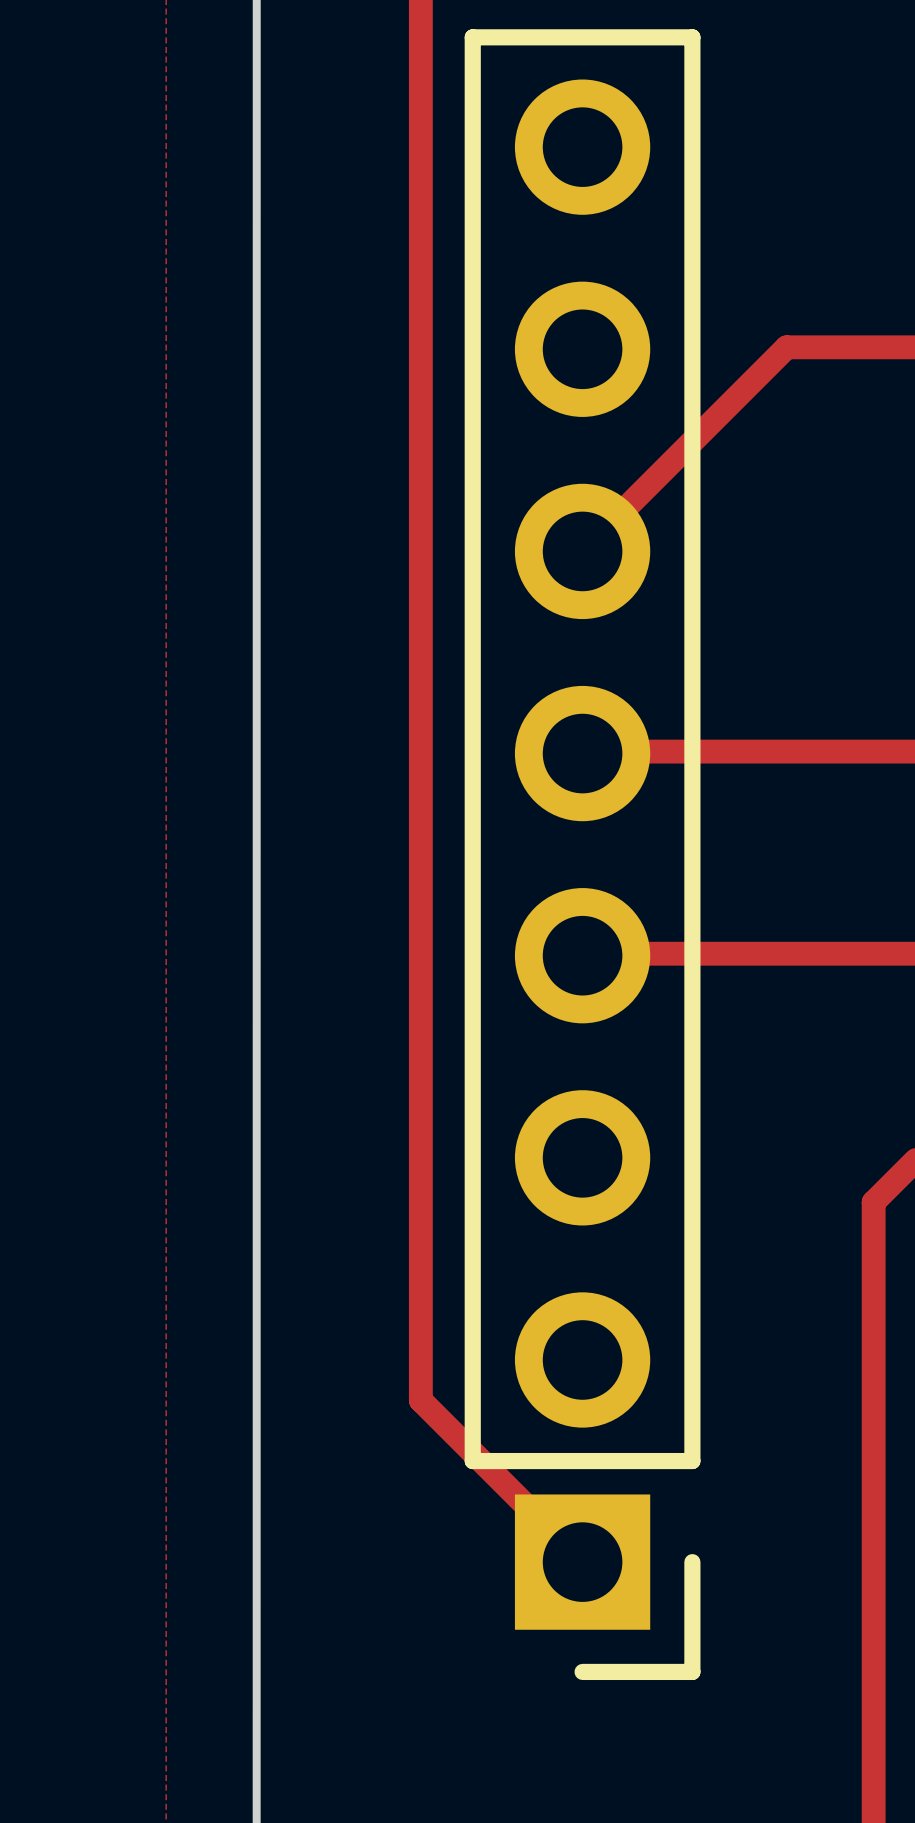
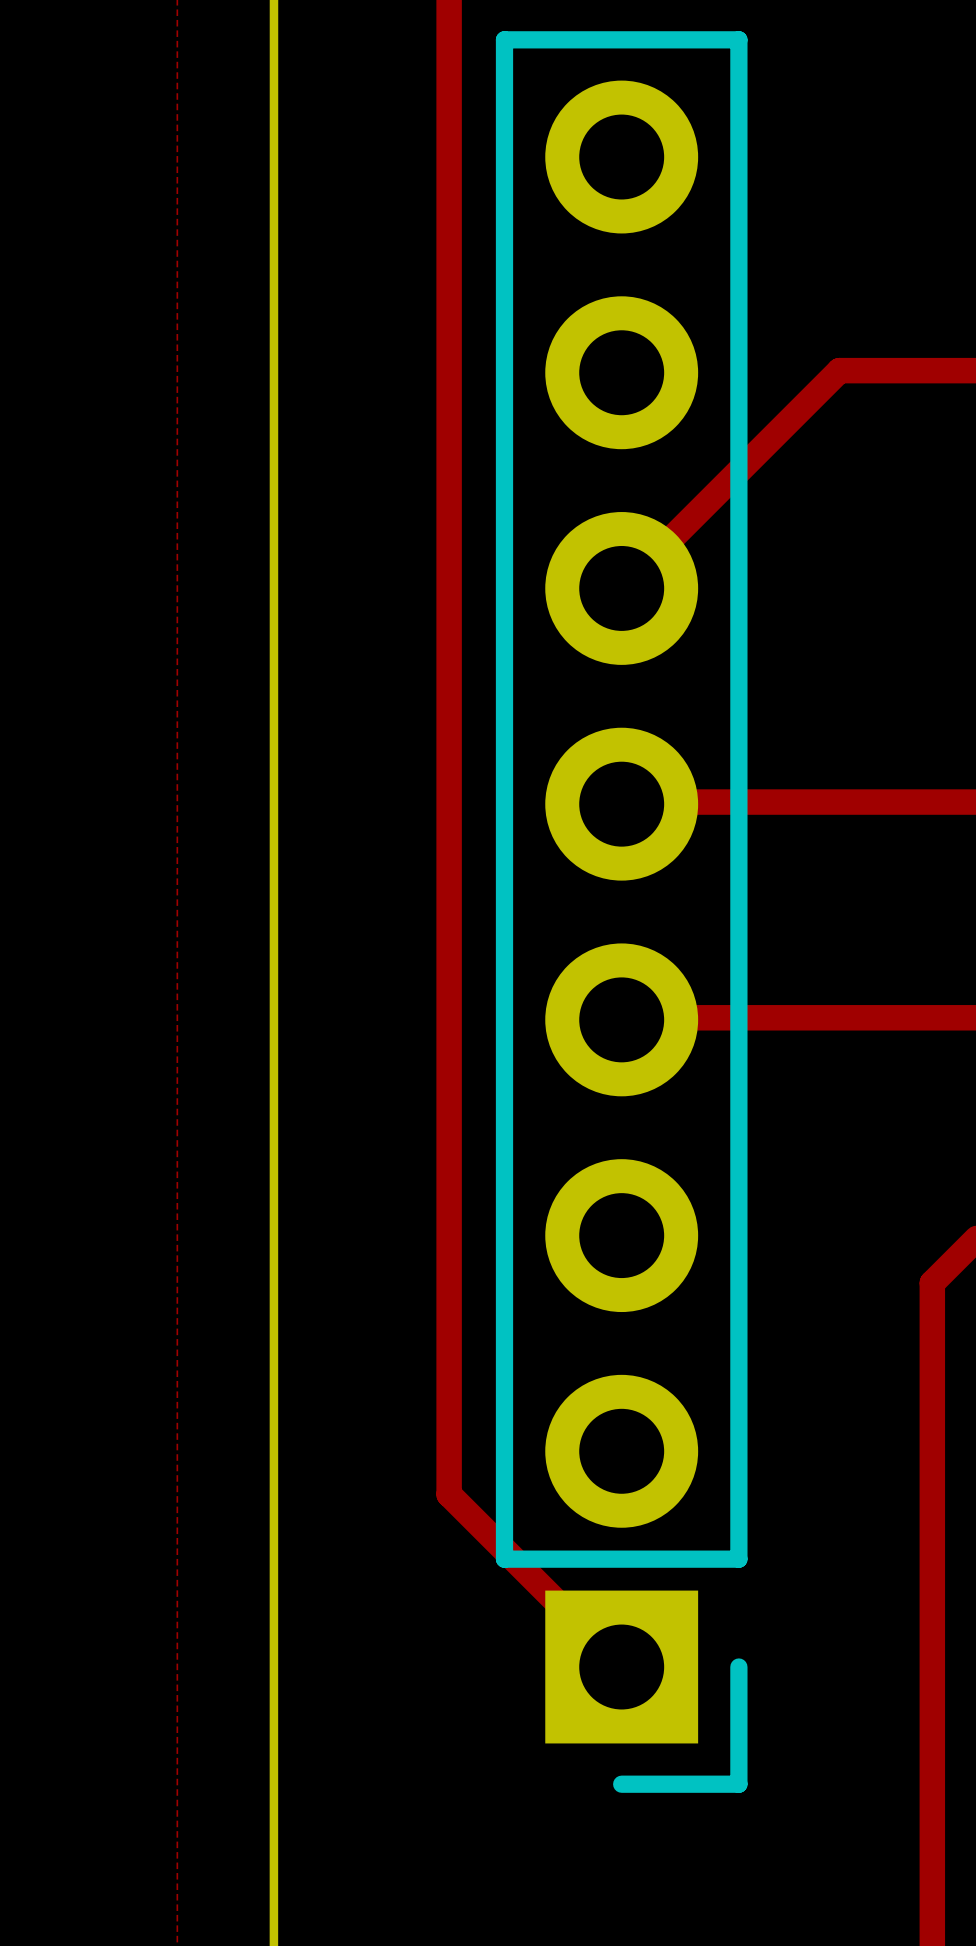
part footprint: [464, 29, 701, 1681] -> [495, 31, 748, 1793]

